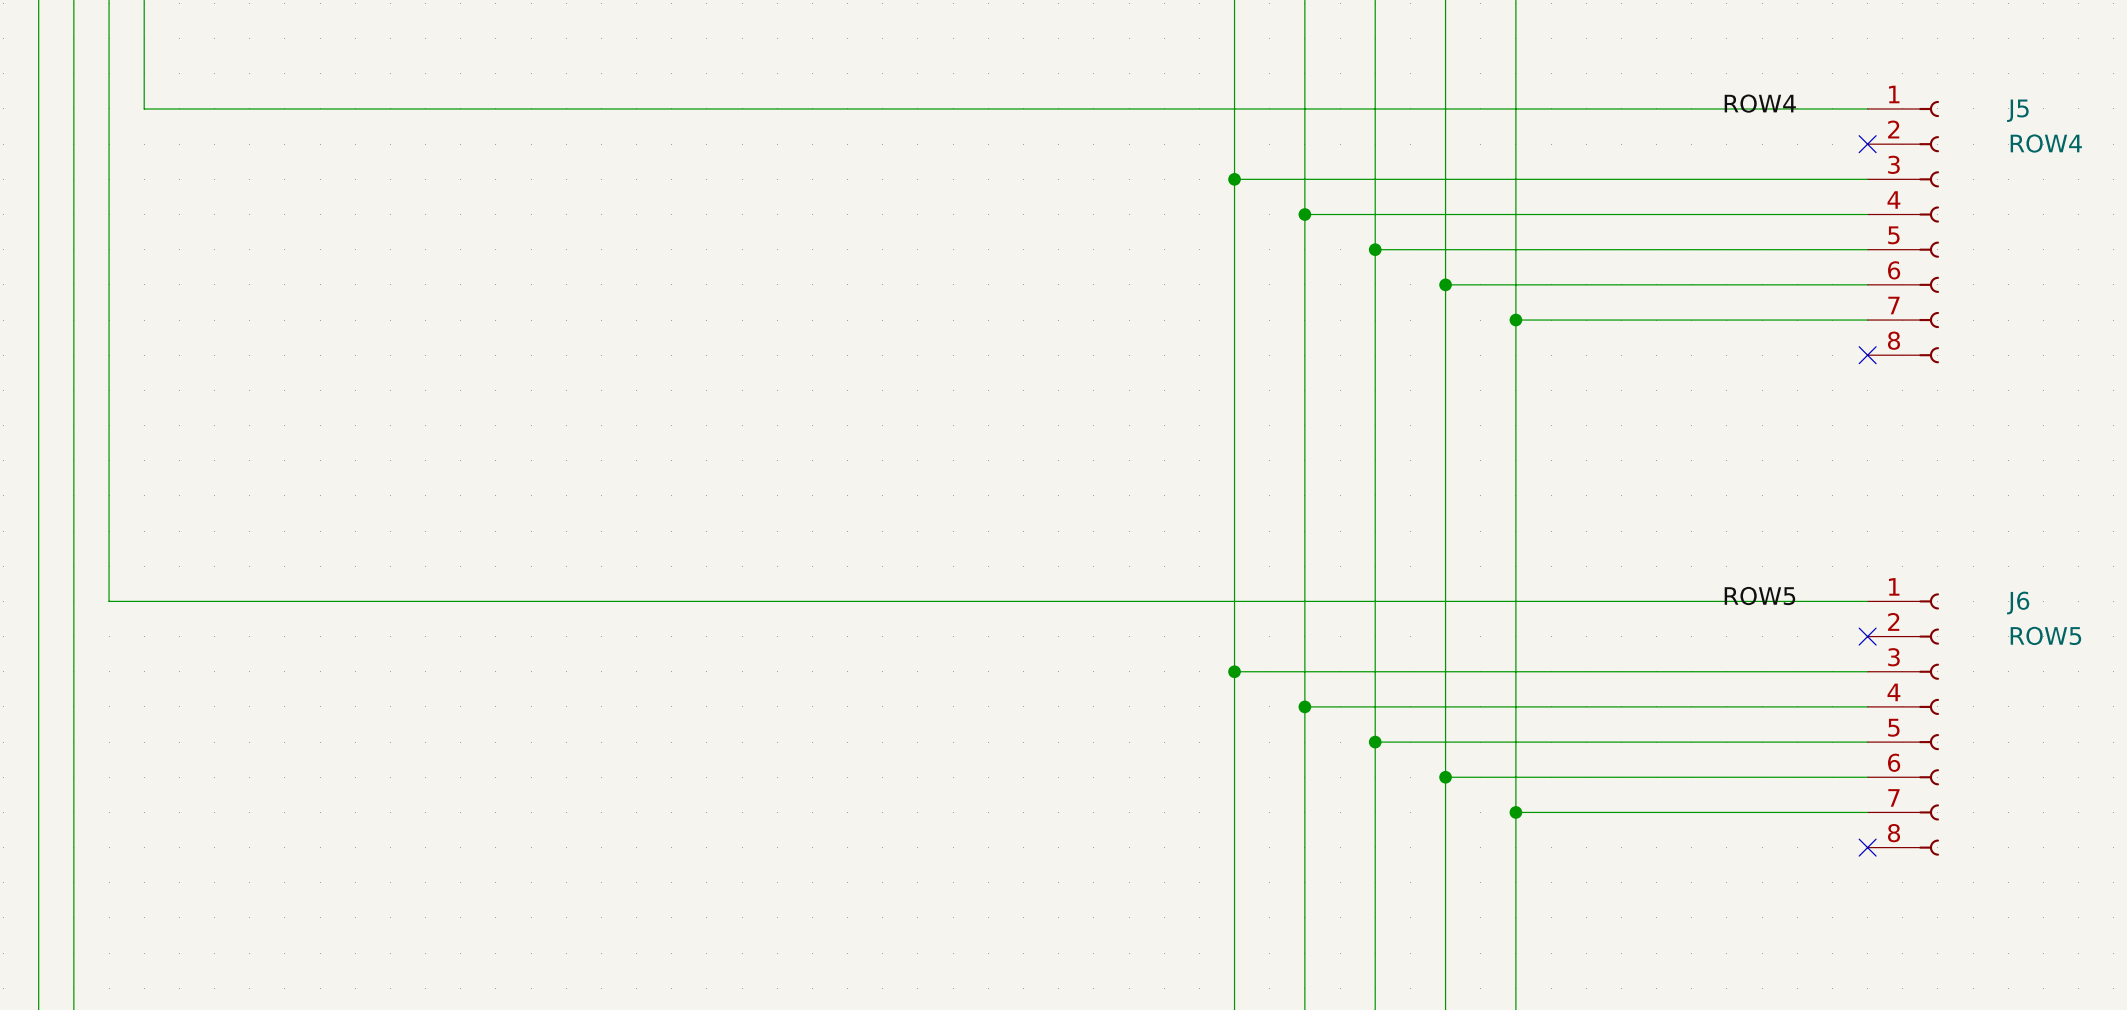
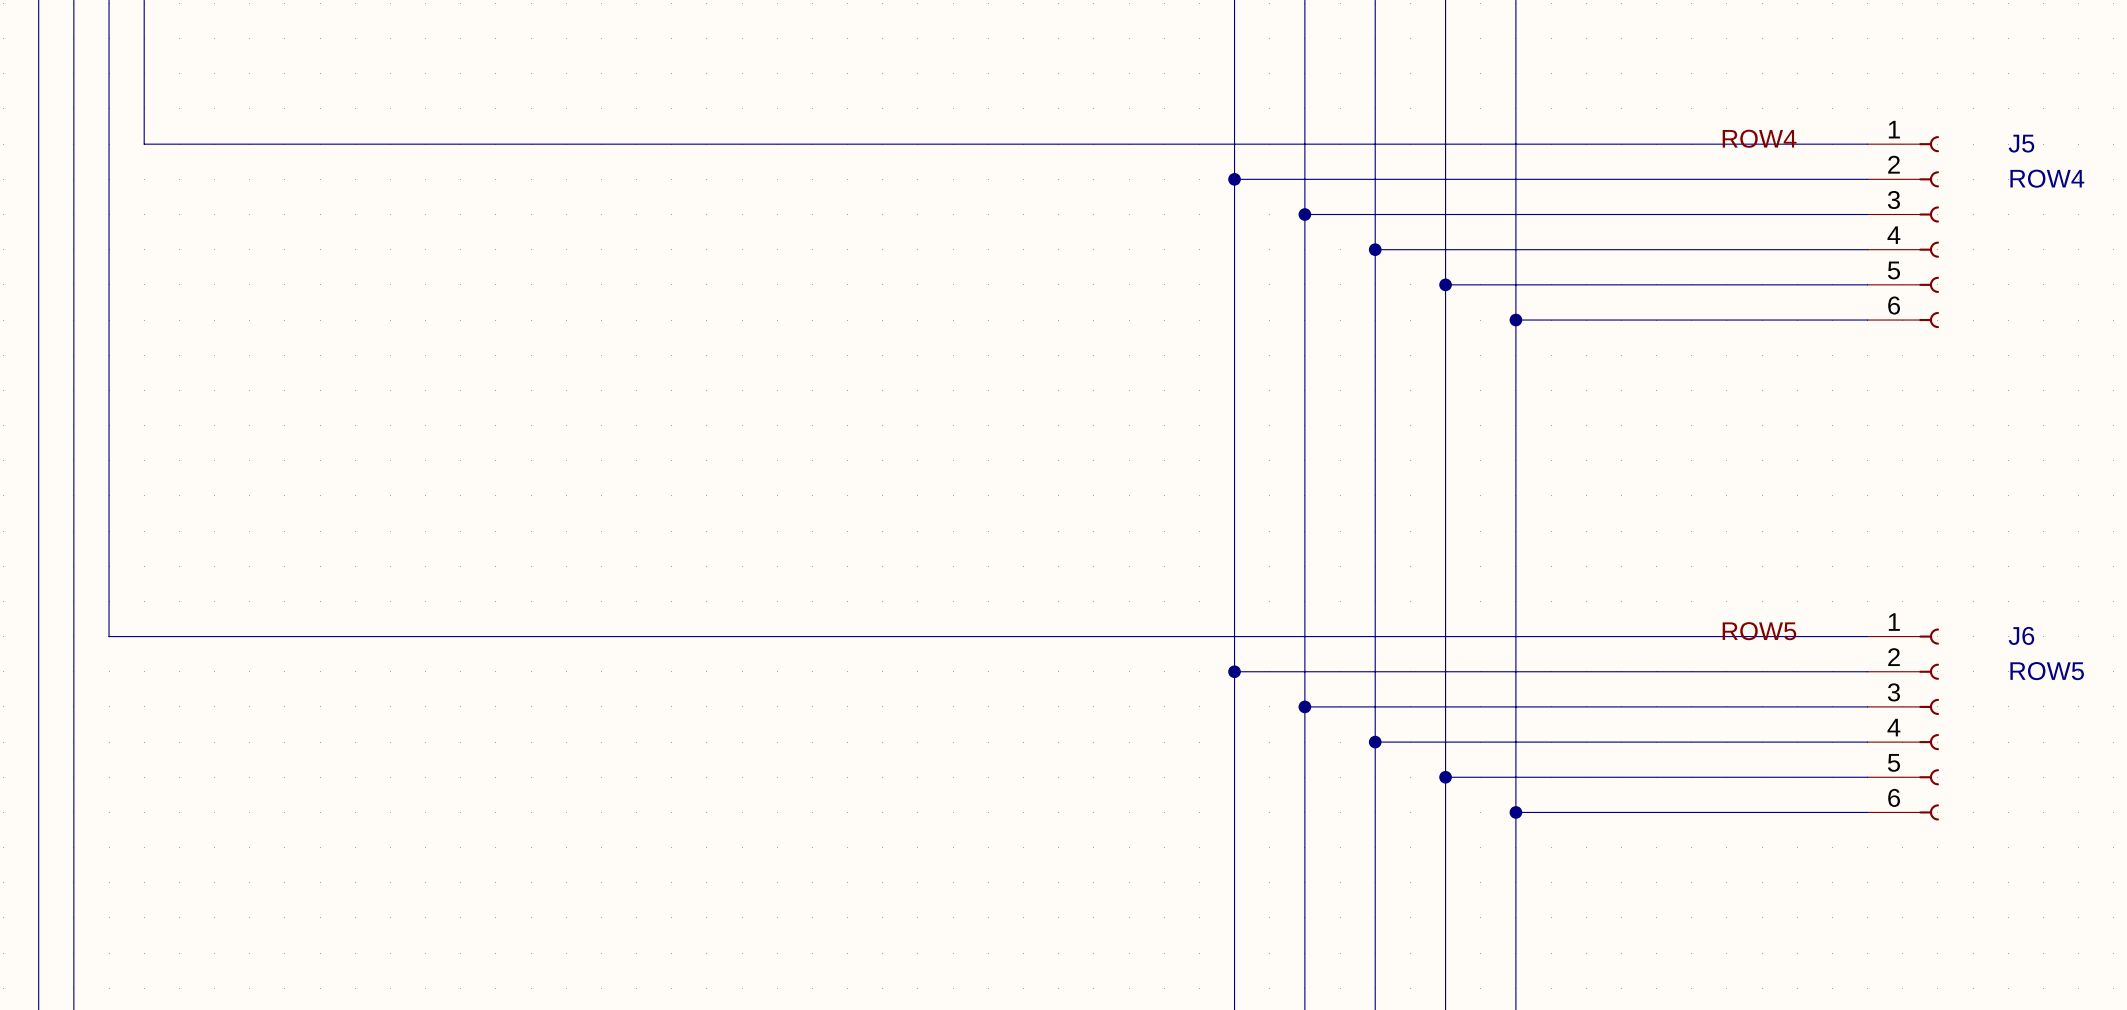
J5 symbol: [1867, 100, 1940, 364] -> [1867, 136, 1940, 329]
label position: ROW4 (1760, 103) -> ROW4 (1759, 138)
wire: (144, 108) (1867, 108) -> (144, 108) (144, 144) (1867, 144)
J5 name position: J5 (2017, 110) -> J5 (2021, 143)
J5 value position: ROW4 (2046, 143) -> ROW4 (2047, 178)
no-connect mark: (1867, 144) -> none
no-connect mark: (1867, 355) -> none
J6 symbol: [1867, 593, 1940, 856] -> [1867, 628, 1940, 821]
label position: ROW5 (1759, 596) -> ROW5 (1759, 631)
wire: (109, 601) (1867, 601) -> (109, 601) (109, 636) (1867, 636)
J6 name position: J6 (2018, 603) -> J6 (2021, 635)
J6 value position: ROW5 (2045, 635) -> ROW5 (2047, 671)
no-connect mark: (1867, 636) -> none
no-connect mark: (1867, 847) -> none

